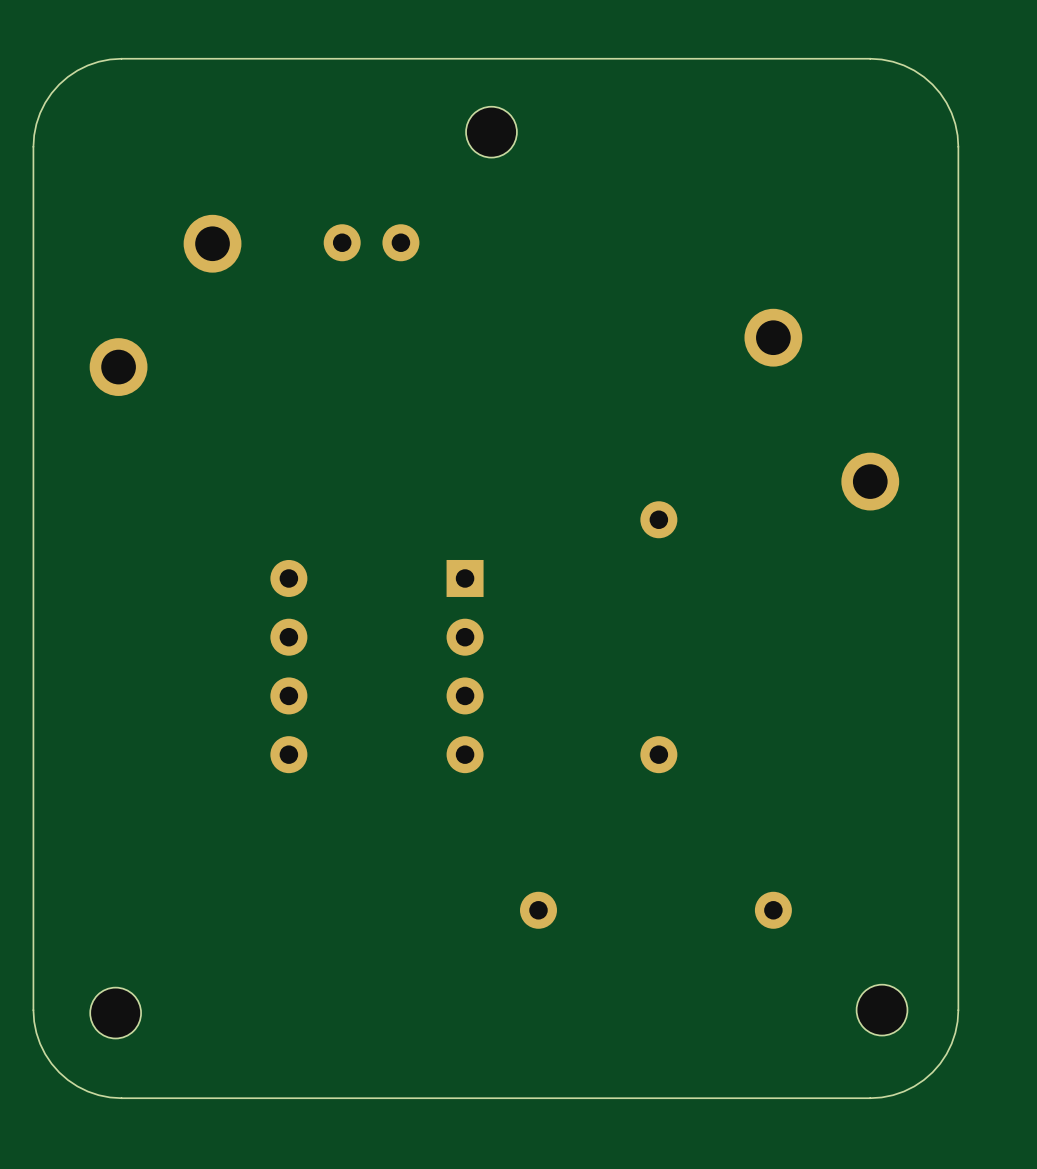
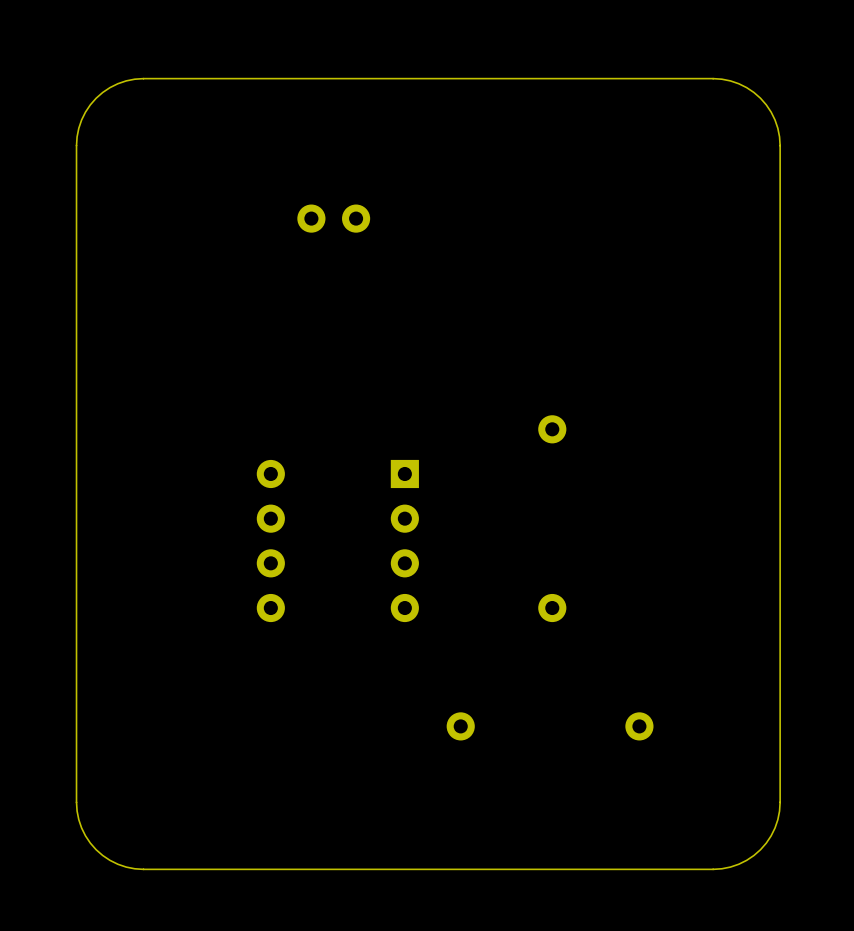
part: (491, 132) -> none
part: (212, 243) -> none
part: (773, 337) -> none
part: (118, 367) -> none
part: (870, 481) -> none
part: (882, 1010) -> none
part: (115, 1013) -> none

